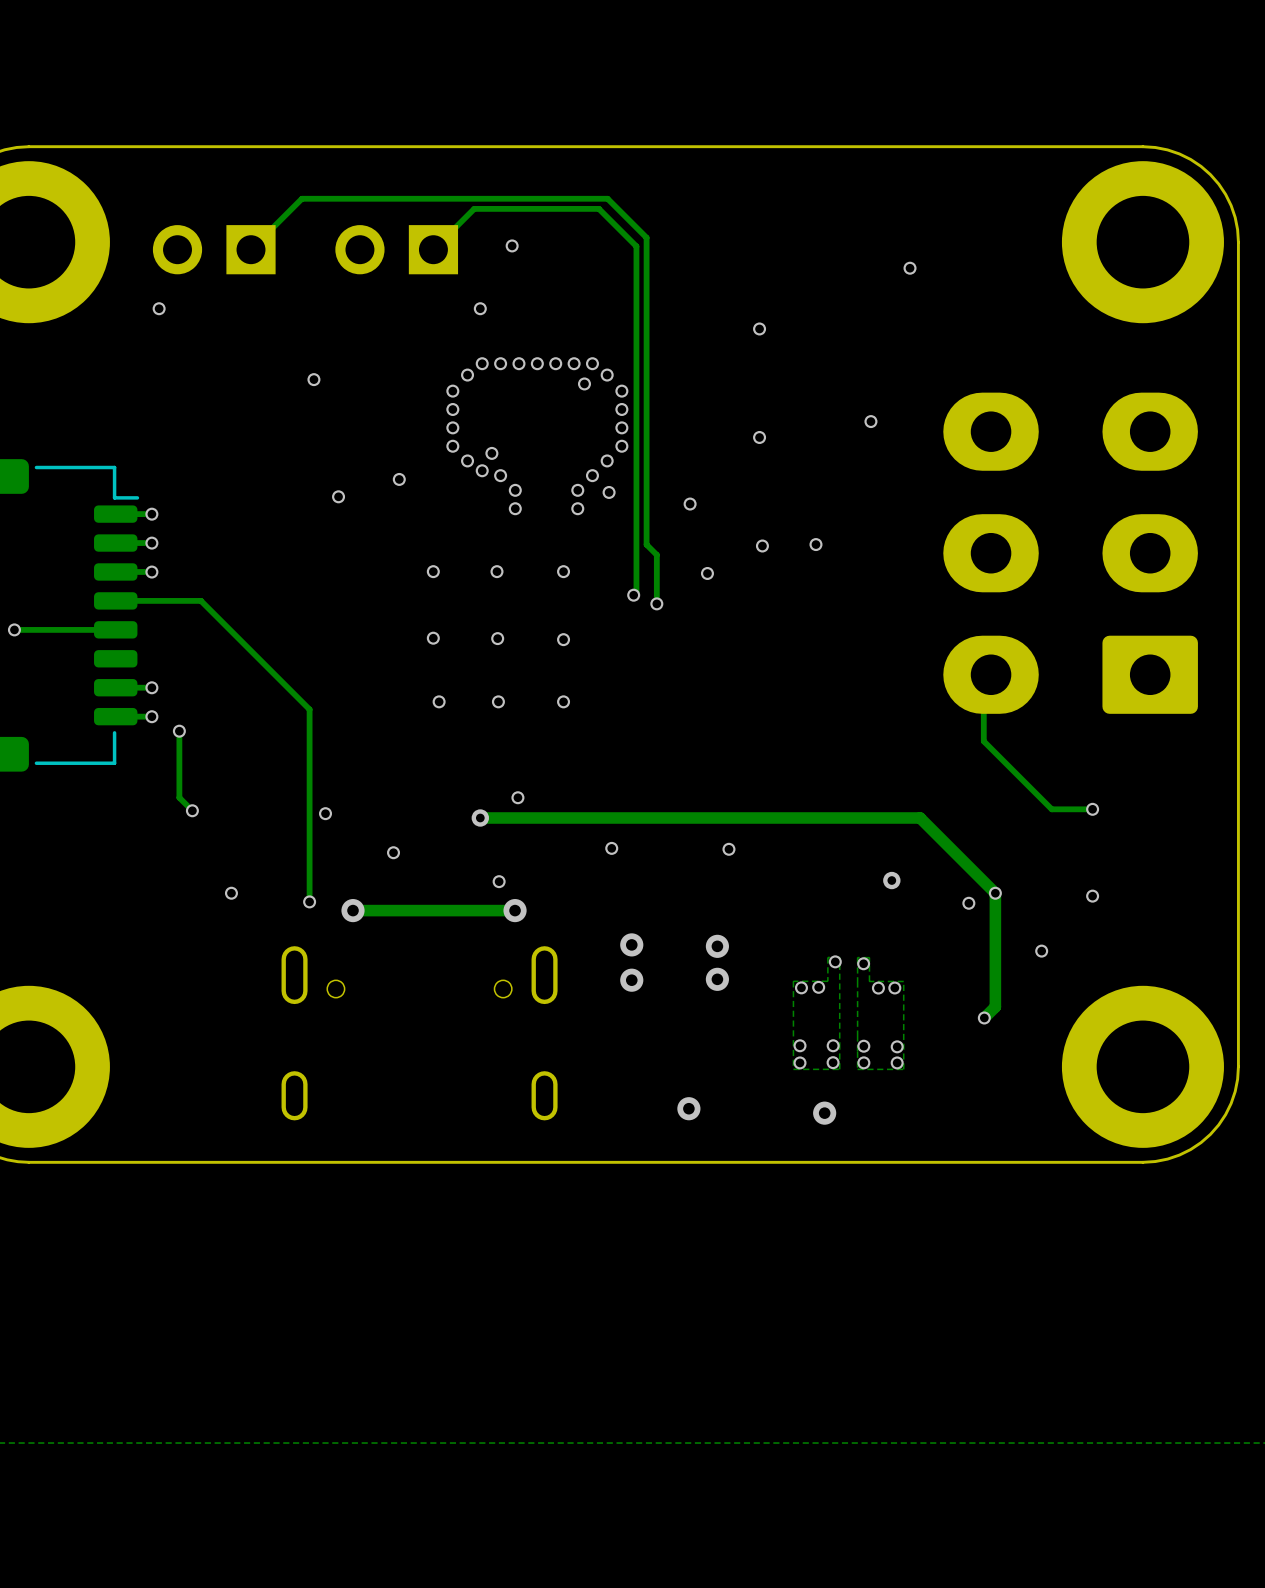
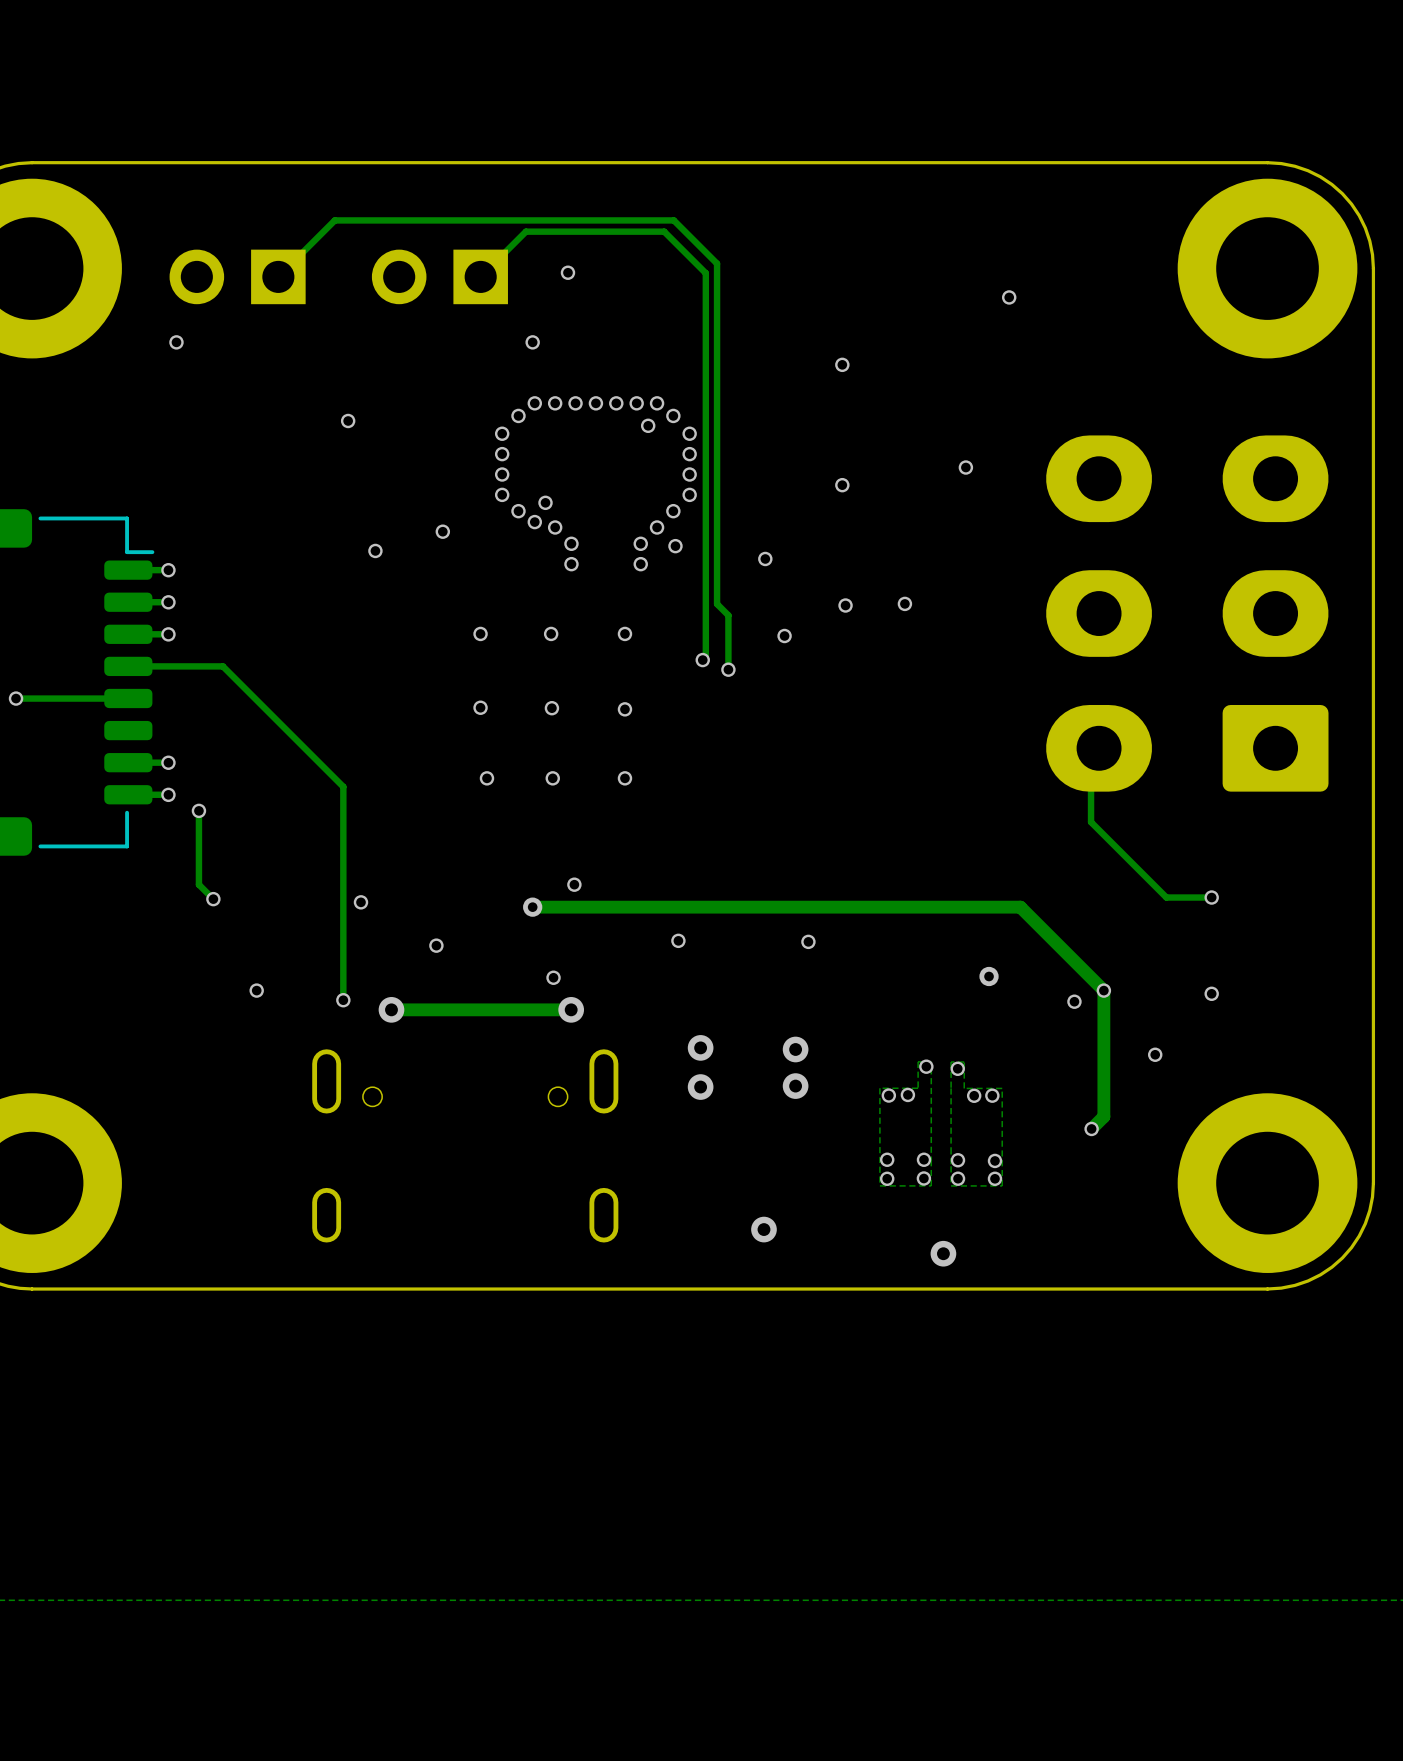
via position: (824, 1113) -> (943, 1253)

